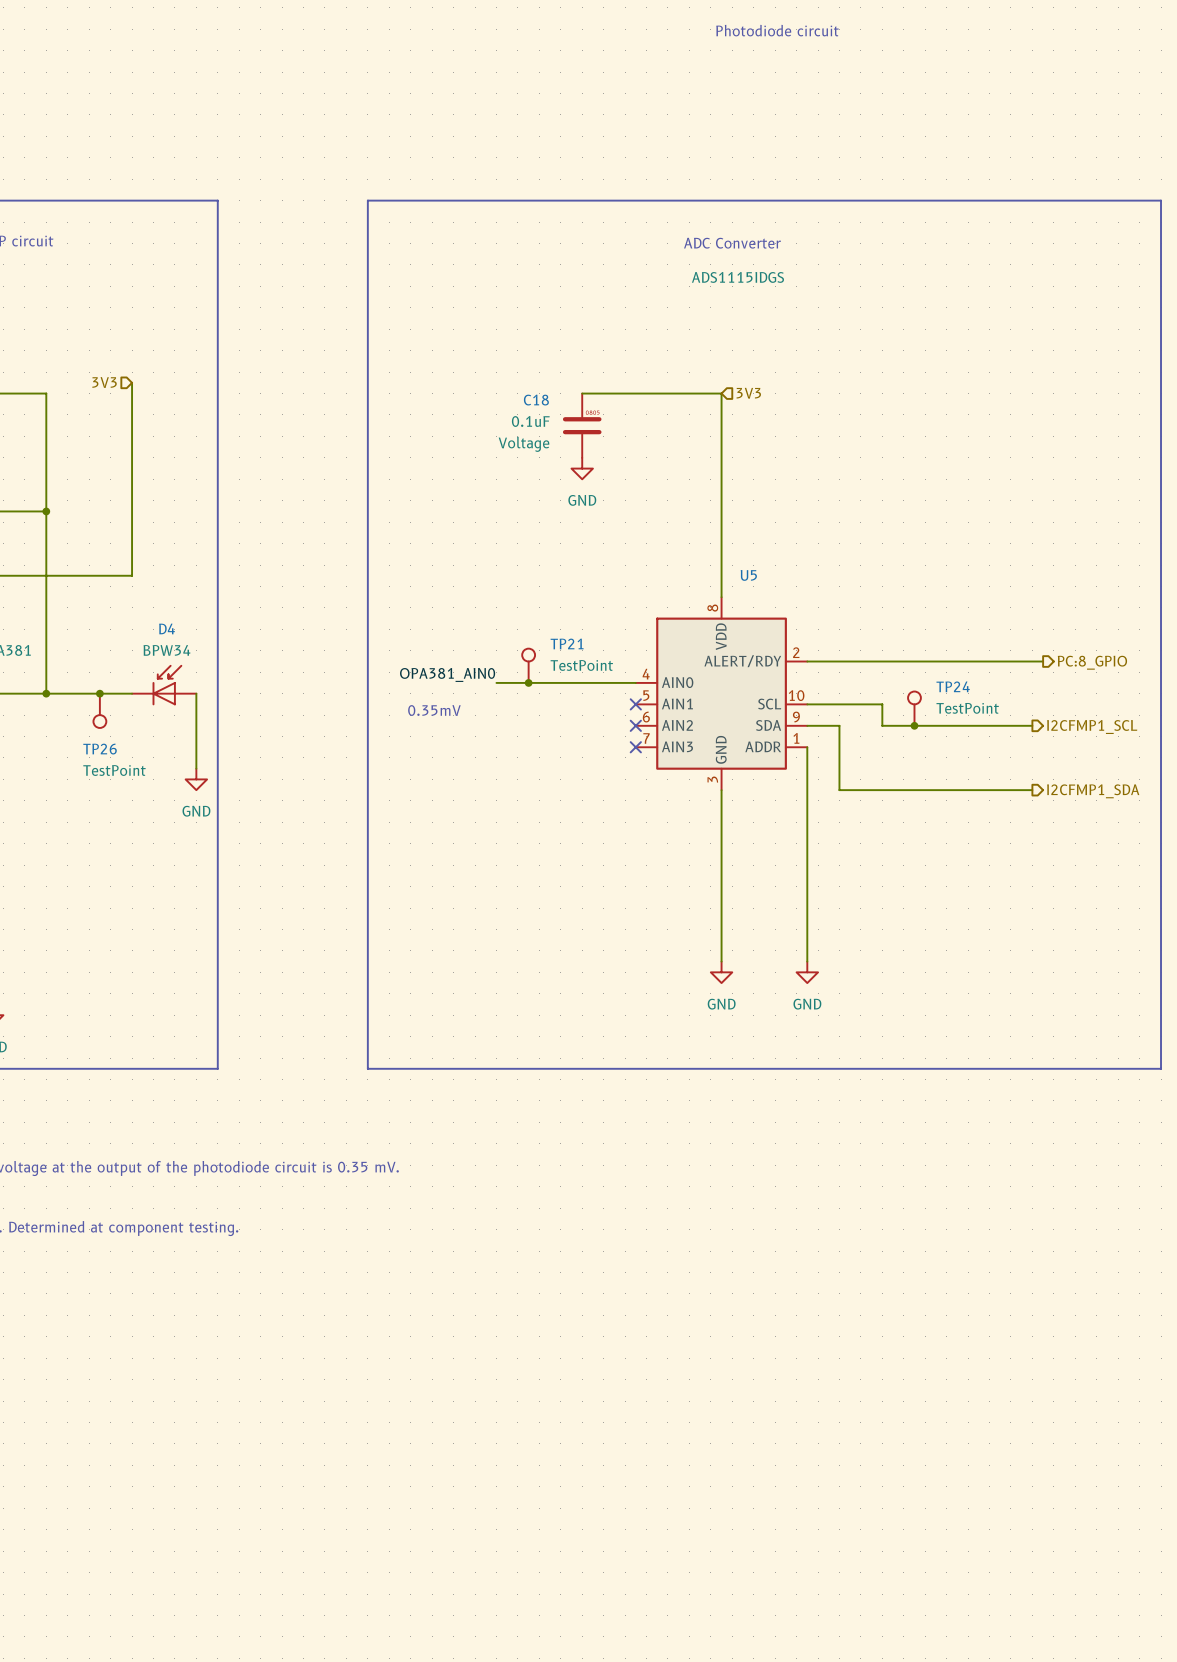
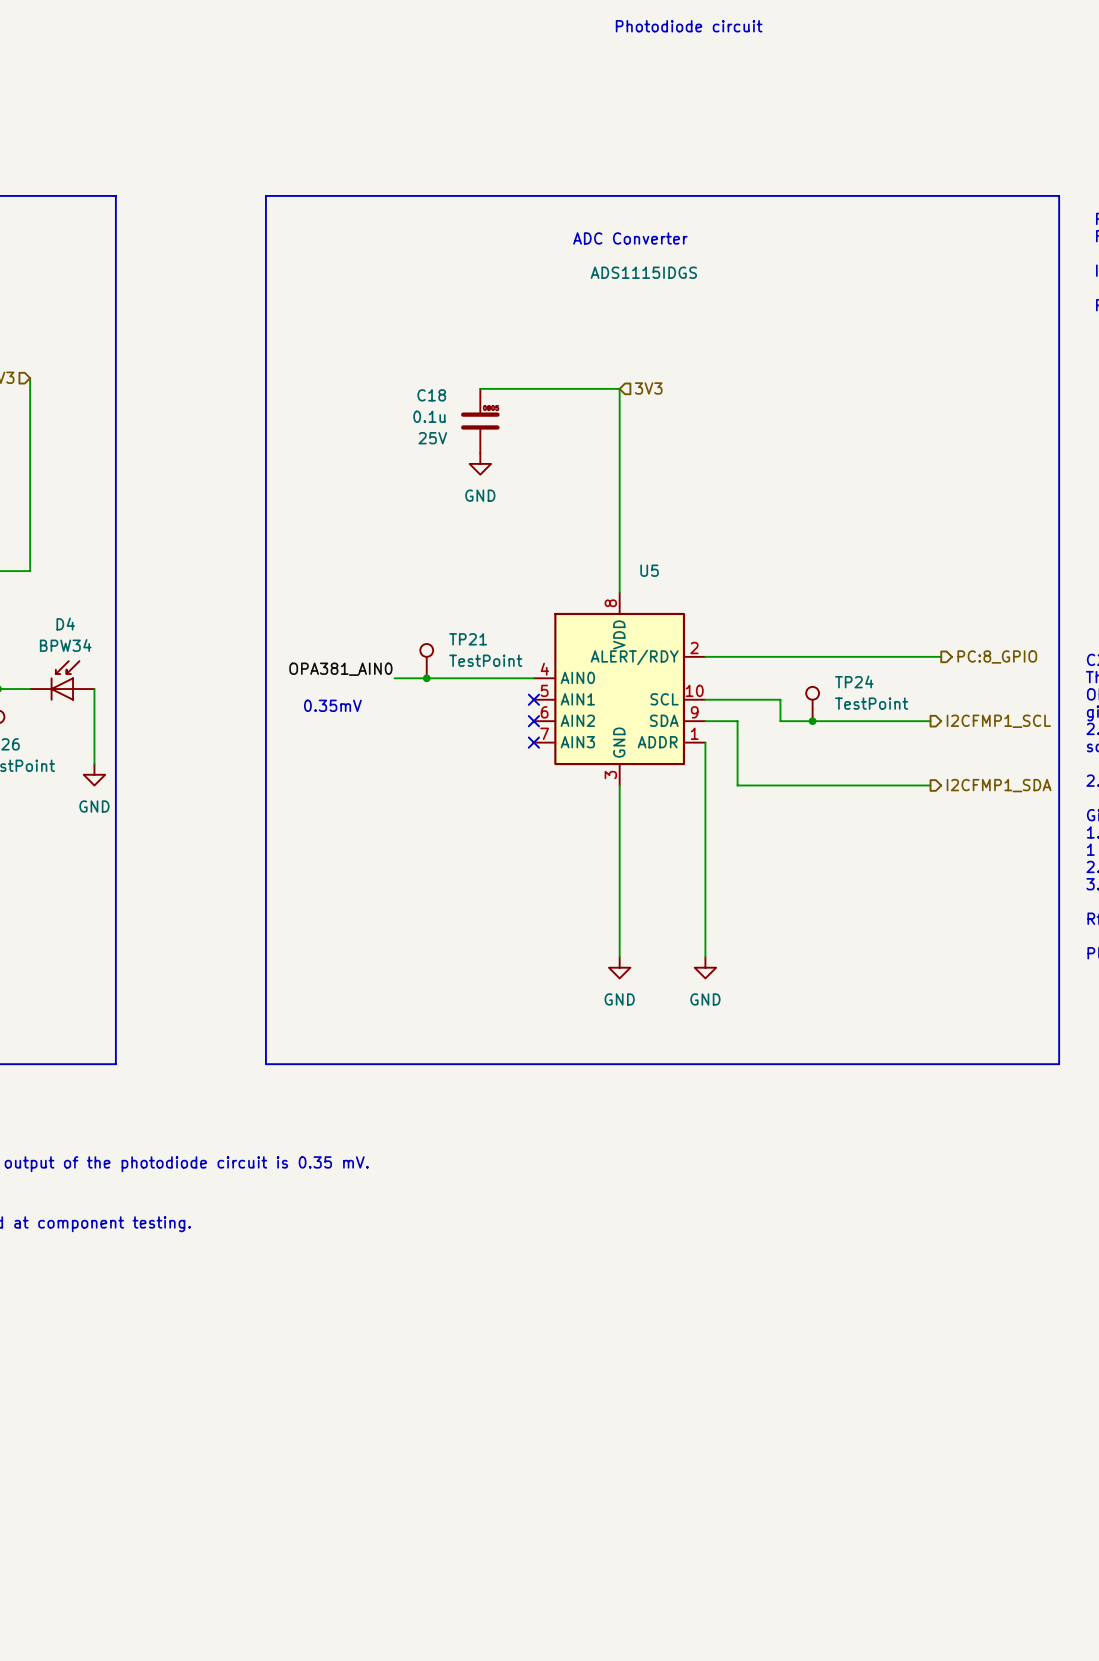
C18 value: 0.1uF (530, 421) -> 0.1u (429, 416)
C18 text: Voltage (523, 444) -> 25V (432, 438)

